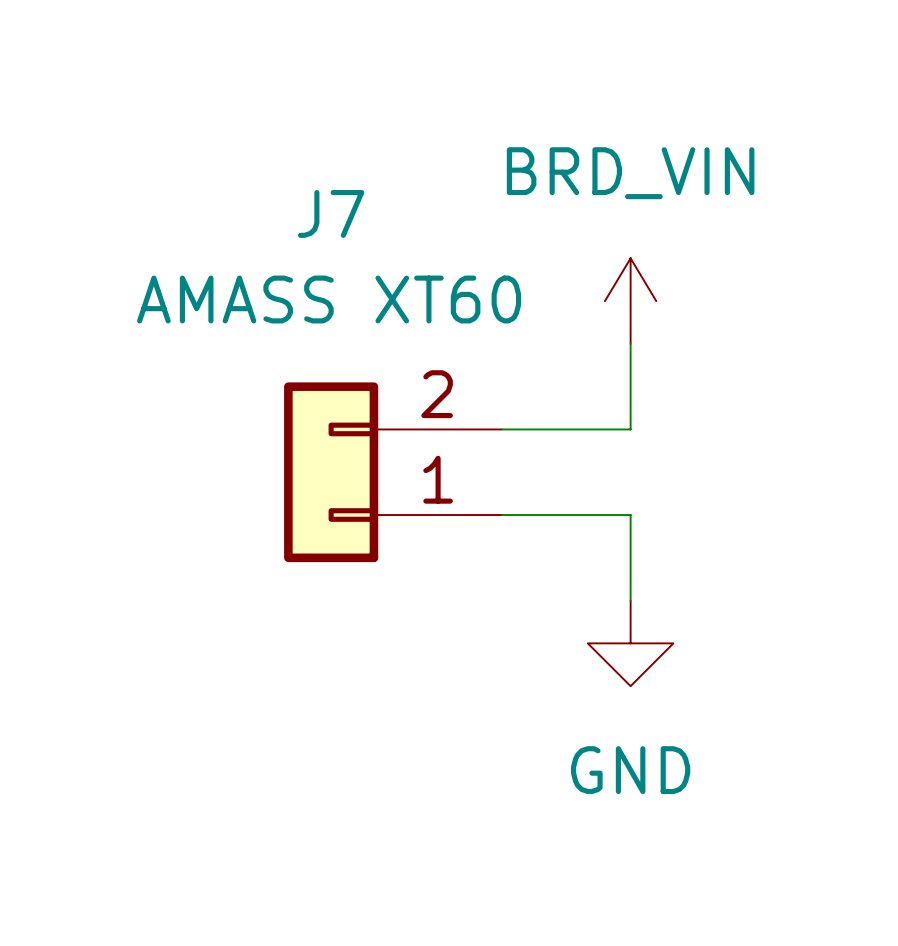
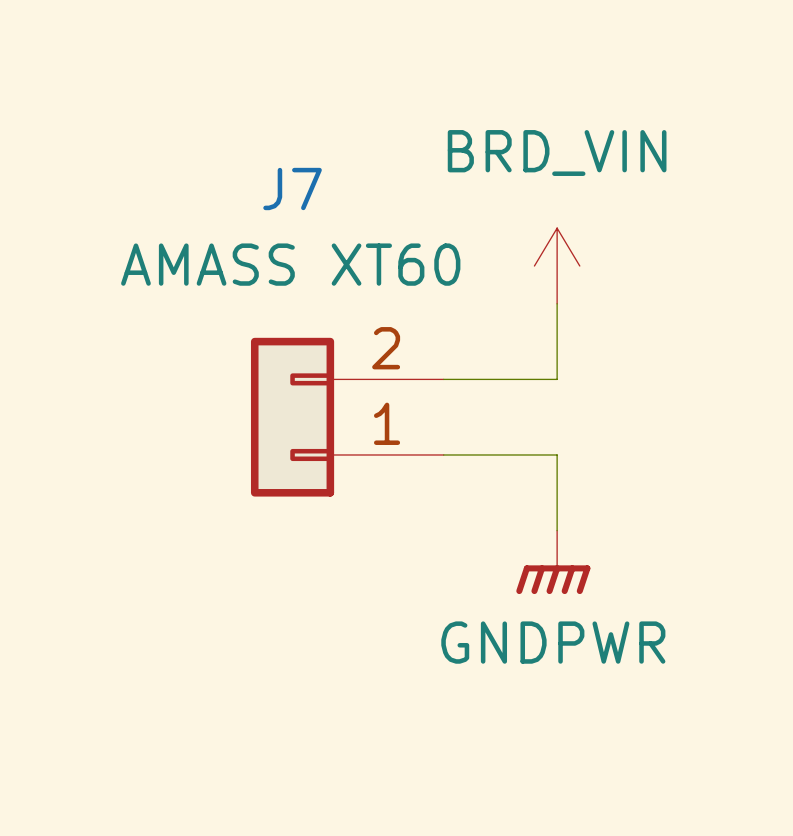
power symbol: GND (630, 643) -> GNDPWR (553, 562)

